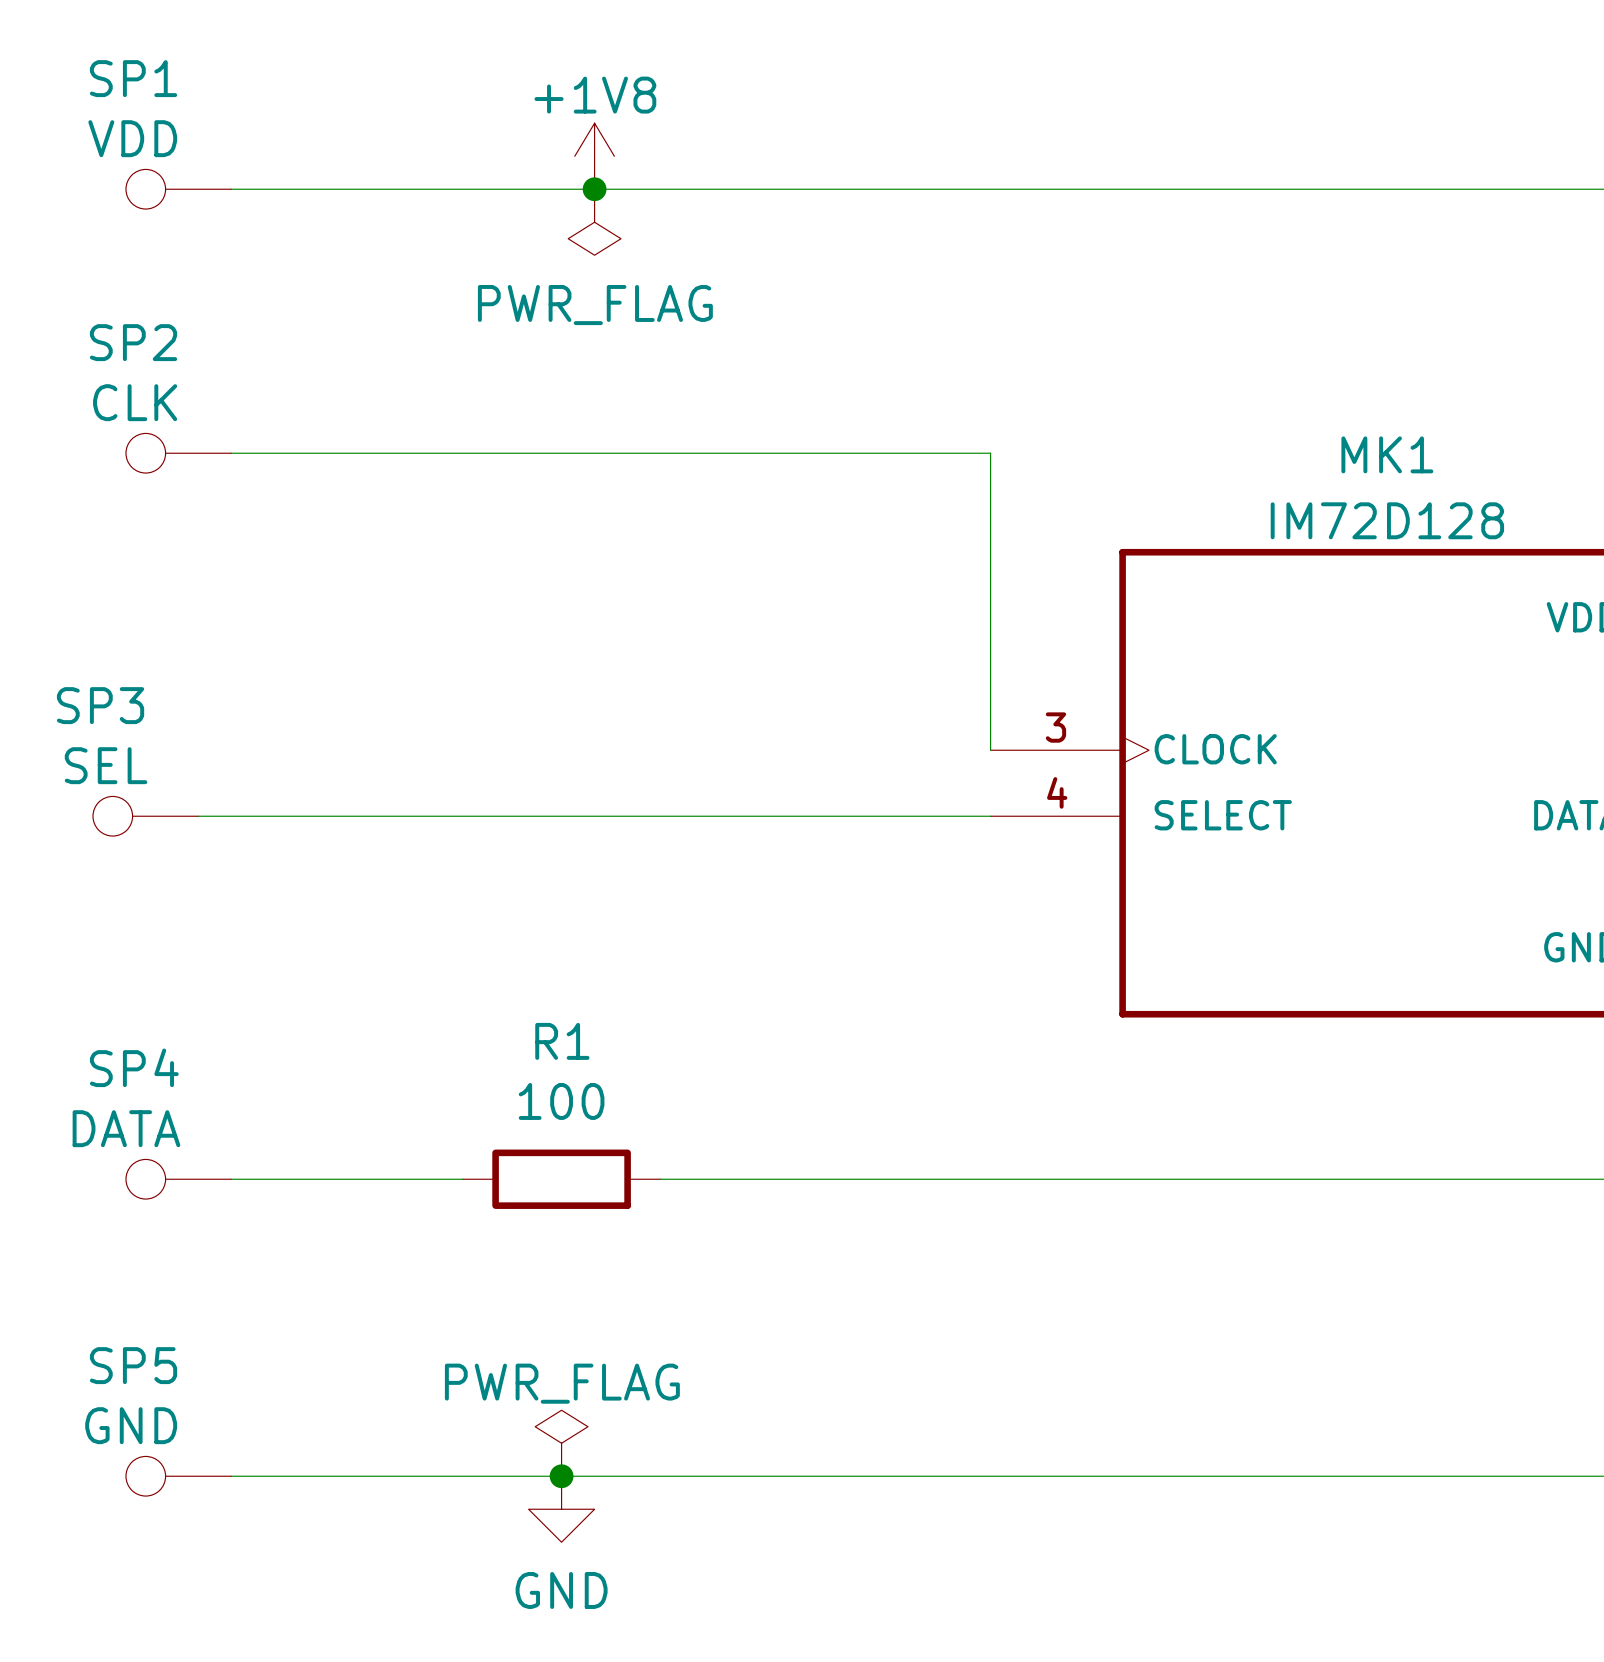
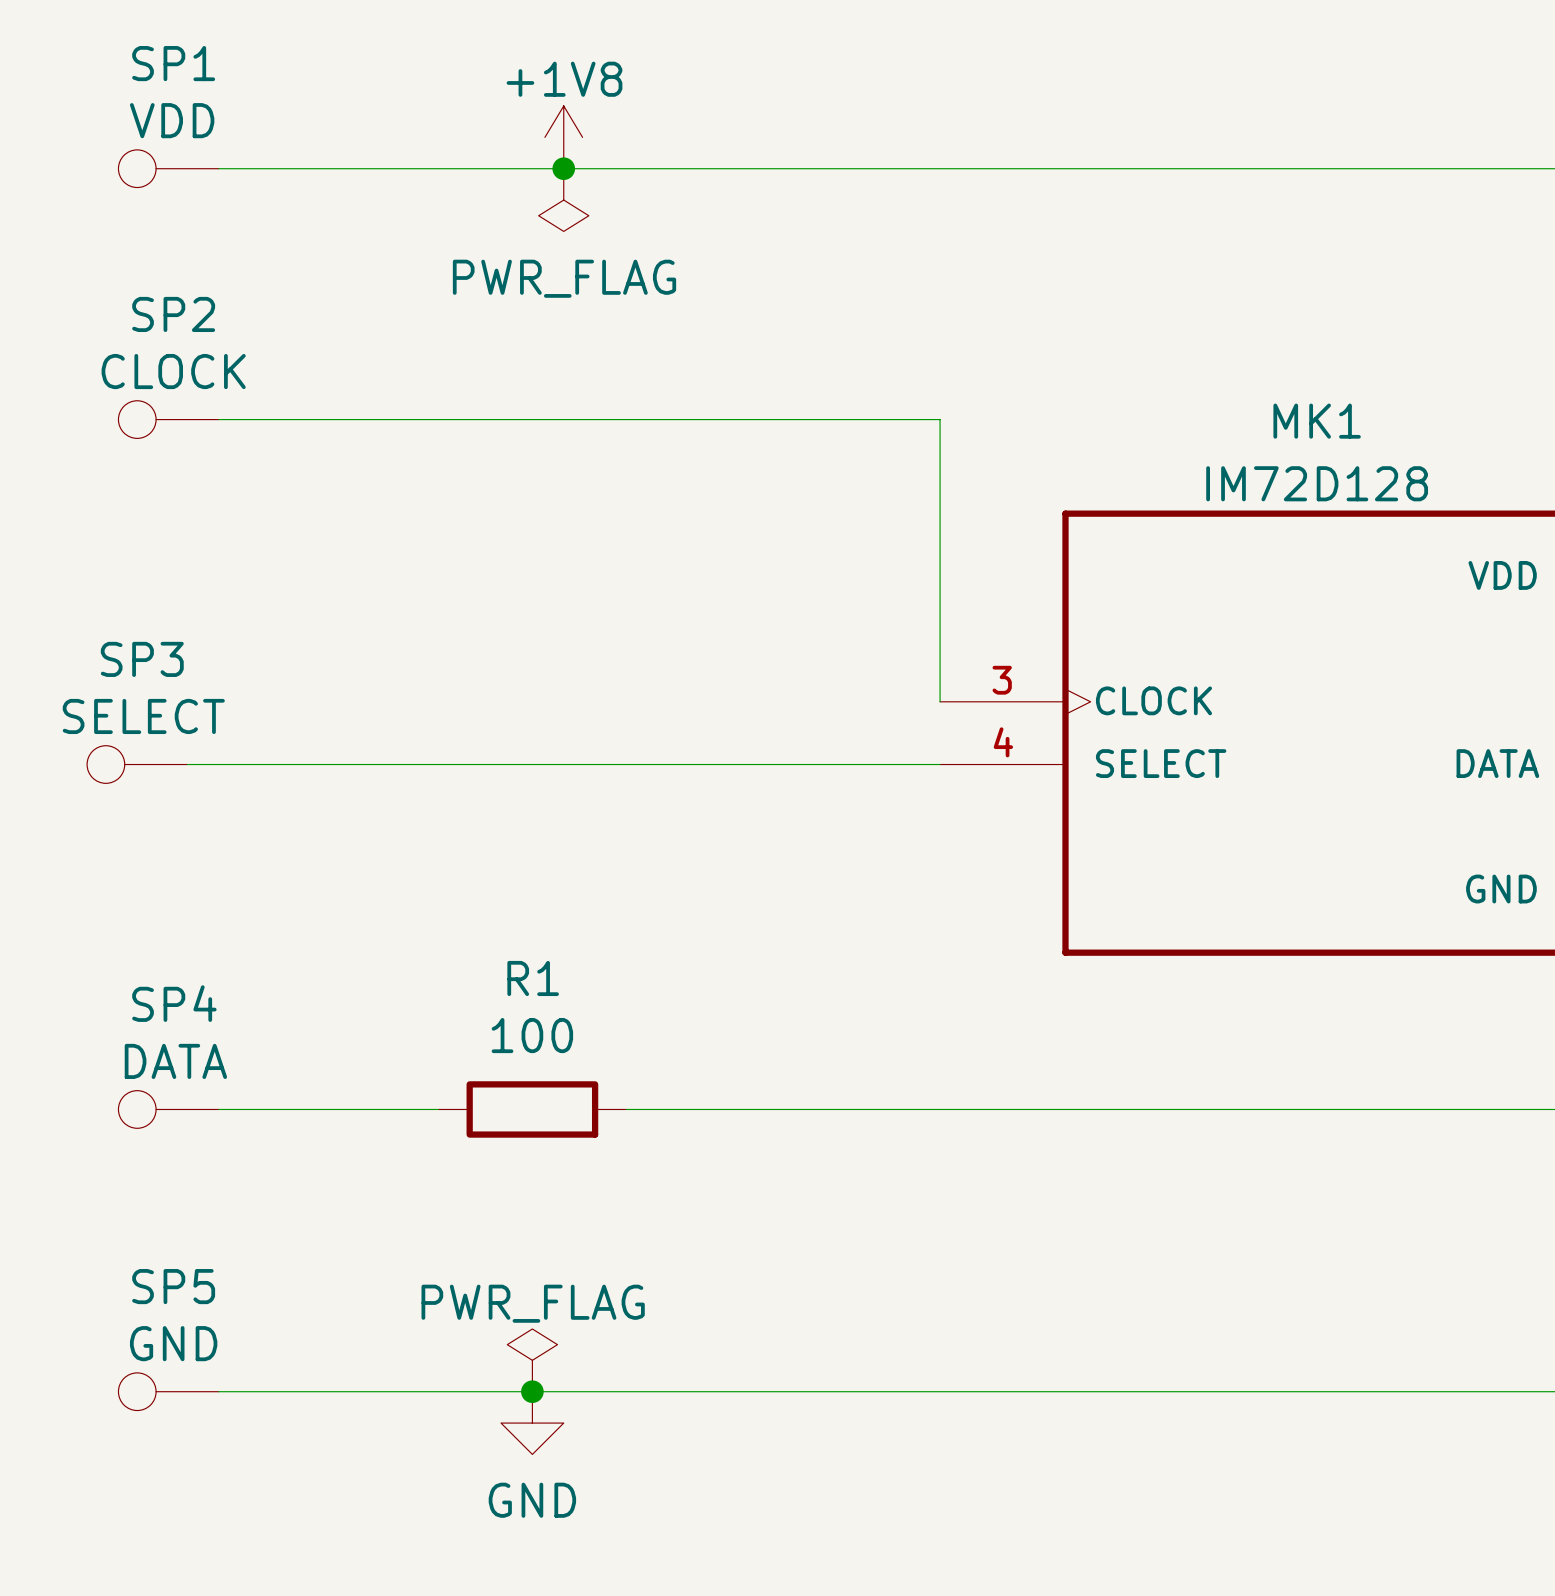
SP1 name position: SP1 (133, 78) -> SP1 (173, 63)
SP1 value position: VDD (132, 138) -> VDD (172, 120)
SP2 name position: SP2 (133, 342) -> SP2 (173, 314)
SP2 value: CLK (135, 402) -> CLOCK (173, 371)
SP3 name position: SP3 (100, 705) -> SP3 (142, 659)
SP3 value: SEL (106, 765) -> SELECT (143, 716)
SP4 name position: SP4 (134, 1067) -> SP4 (174, 1003)
SP4 value position: DATA (126, 1128) -> DATA (175, 1061)
SP5 name position: SP5 (133, 1365) -> SP5 (173, 1286)
SP5 value position: GND (131, 1425) -> GND (173, 1343)

